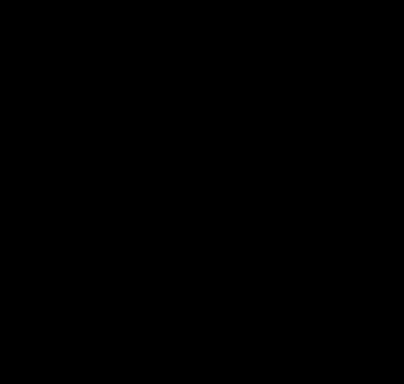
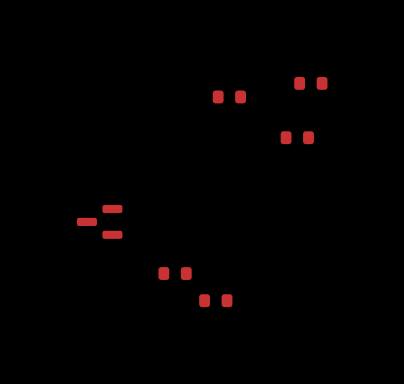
part: none -> (310, 83)
part: none -> (229, 96)
part: none -> (297, 137)
part: none -> (99, 221)
part: none -> (175, 273)
part: none -> (215, 300)

